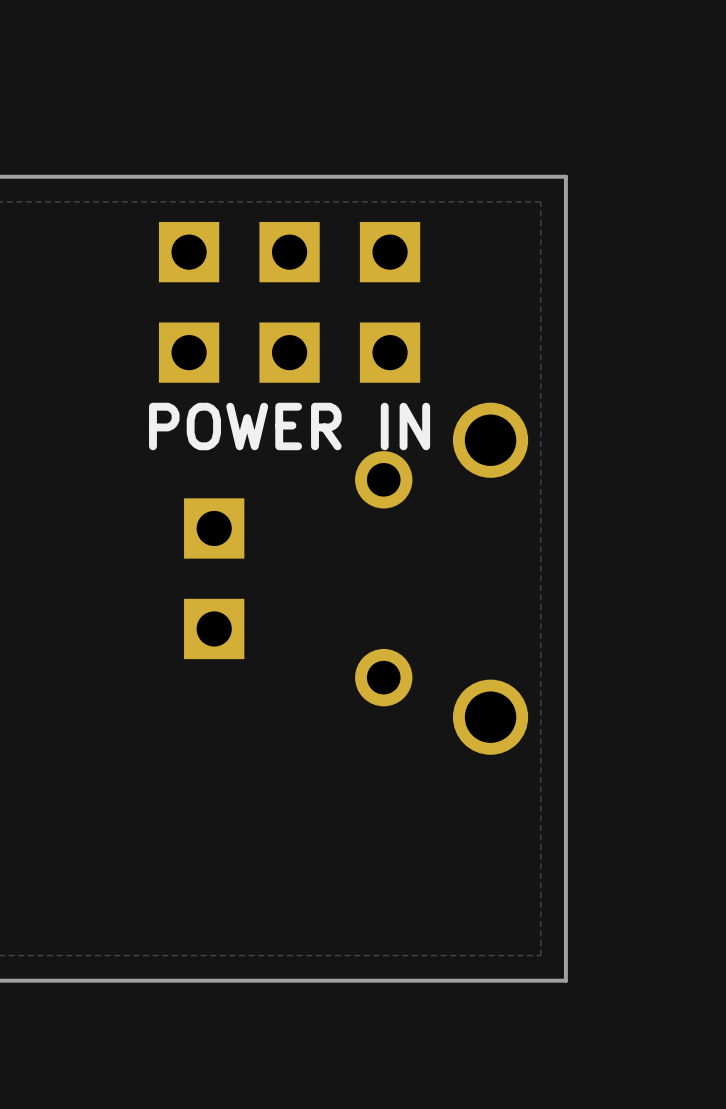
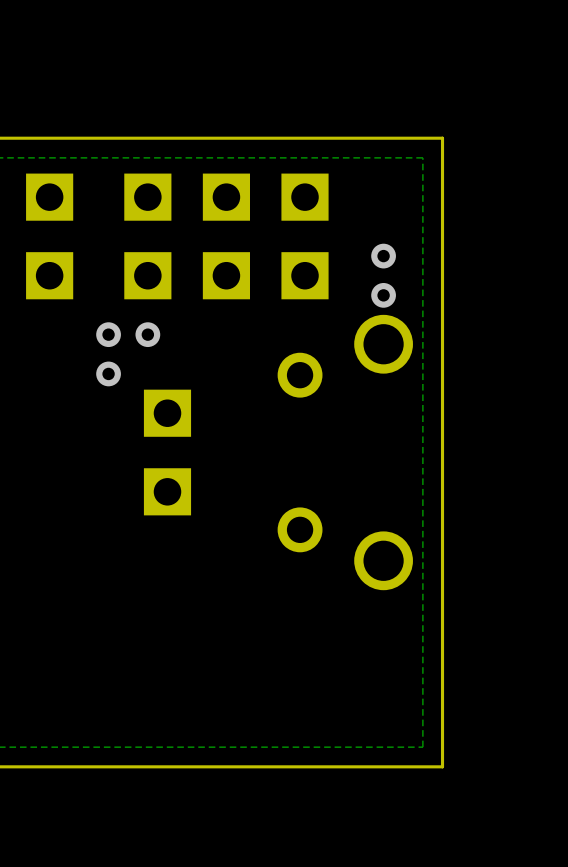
part: none -> (49, 197)
via: none -> (383, 256)
part: none -> (49, 275)
via: none -> (383, 295)
text: POWER IN (289, 426) -> none
via: none -> (108, 334)
via: none -> (147, 334)
via: none -> (108, 373)

